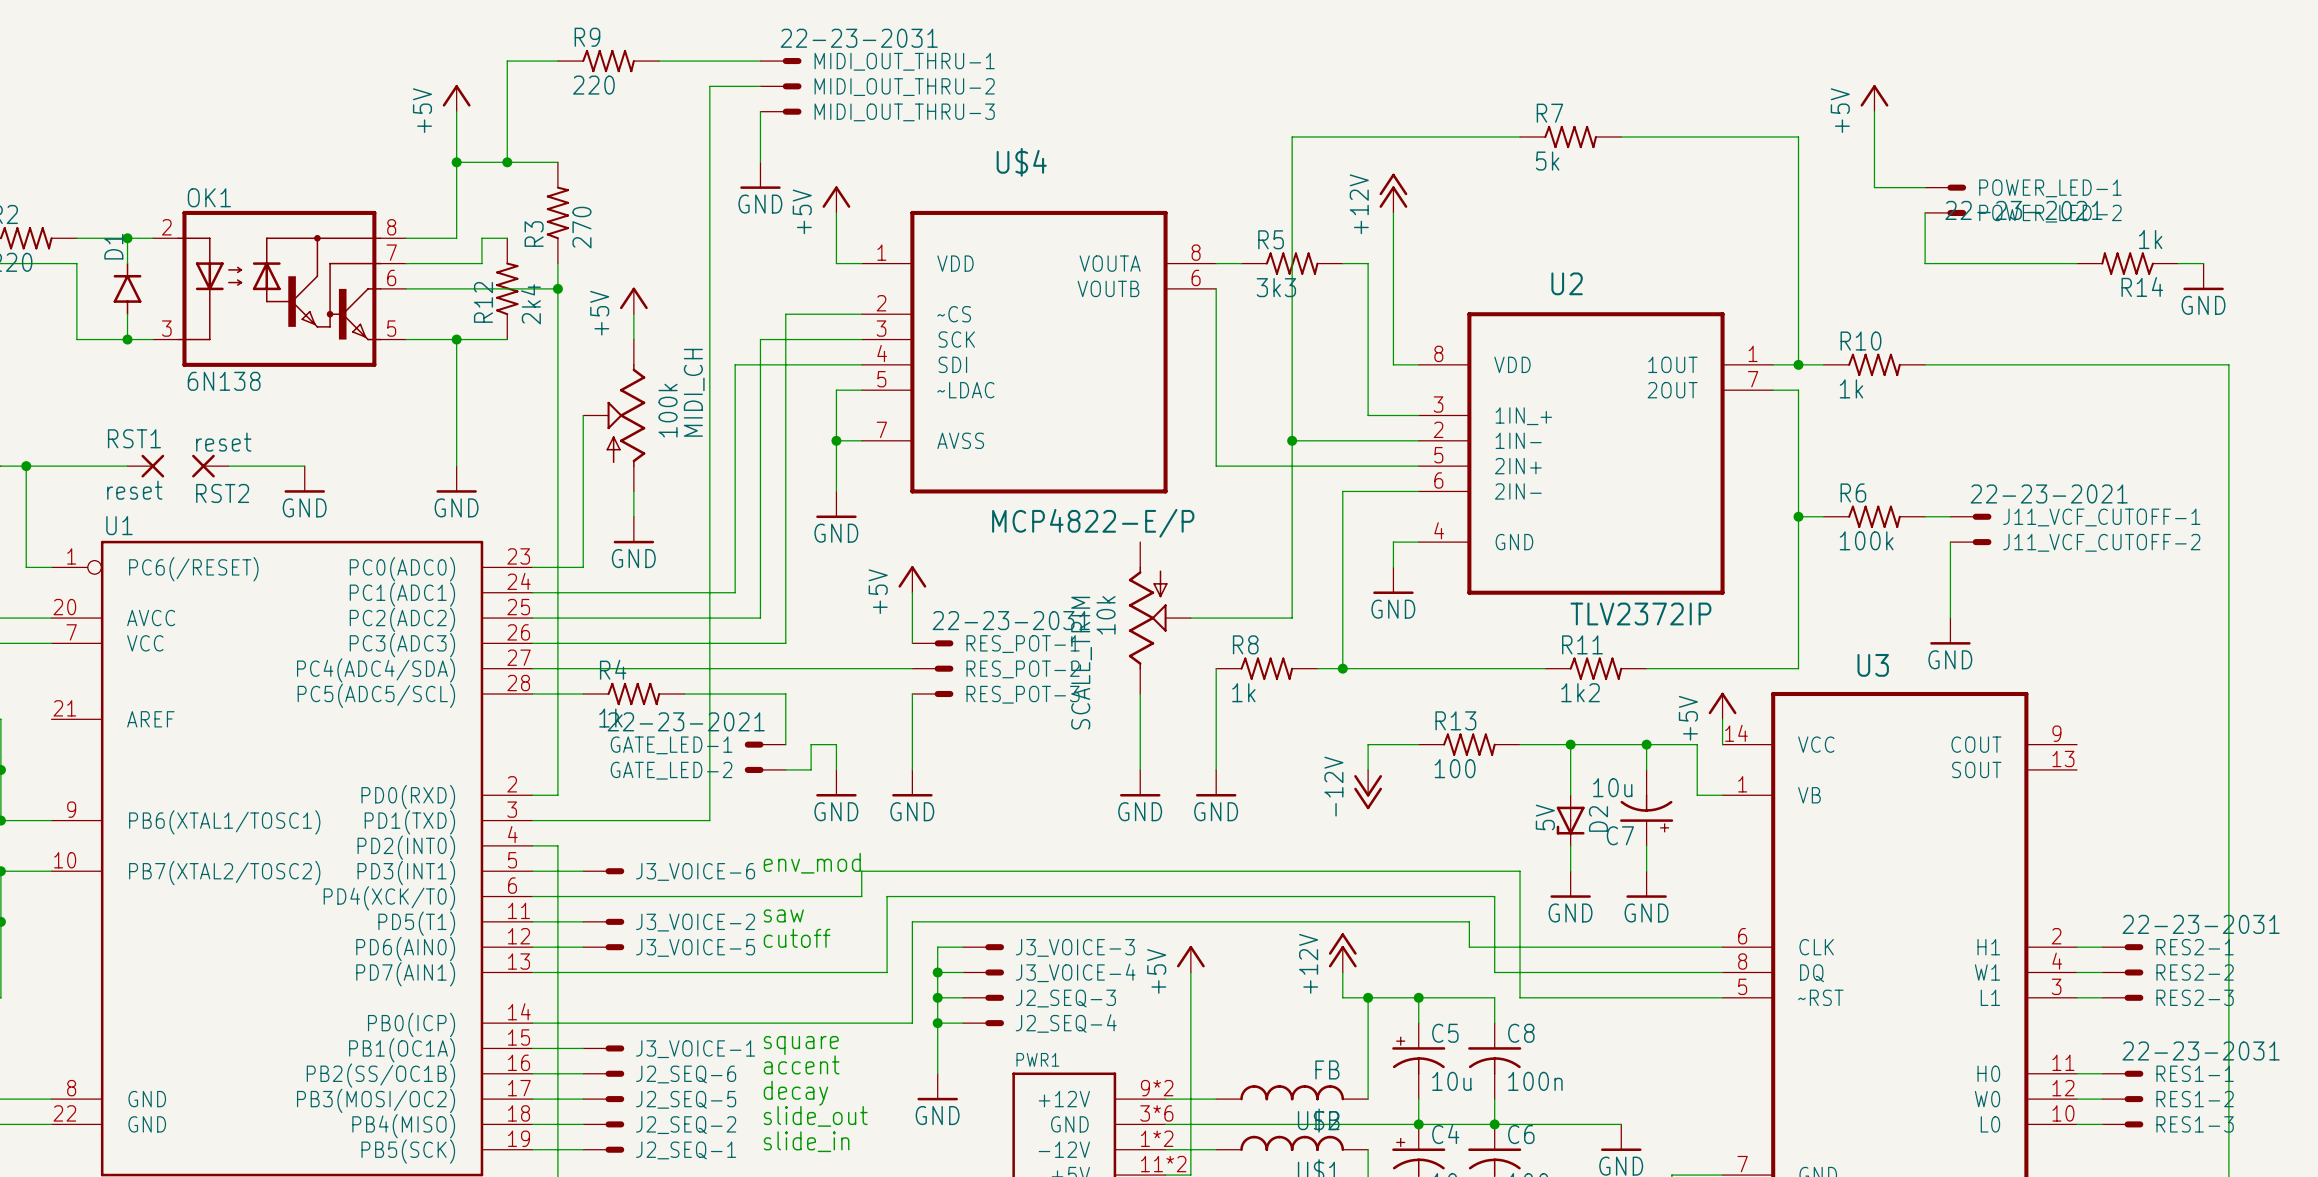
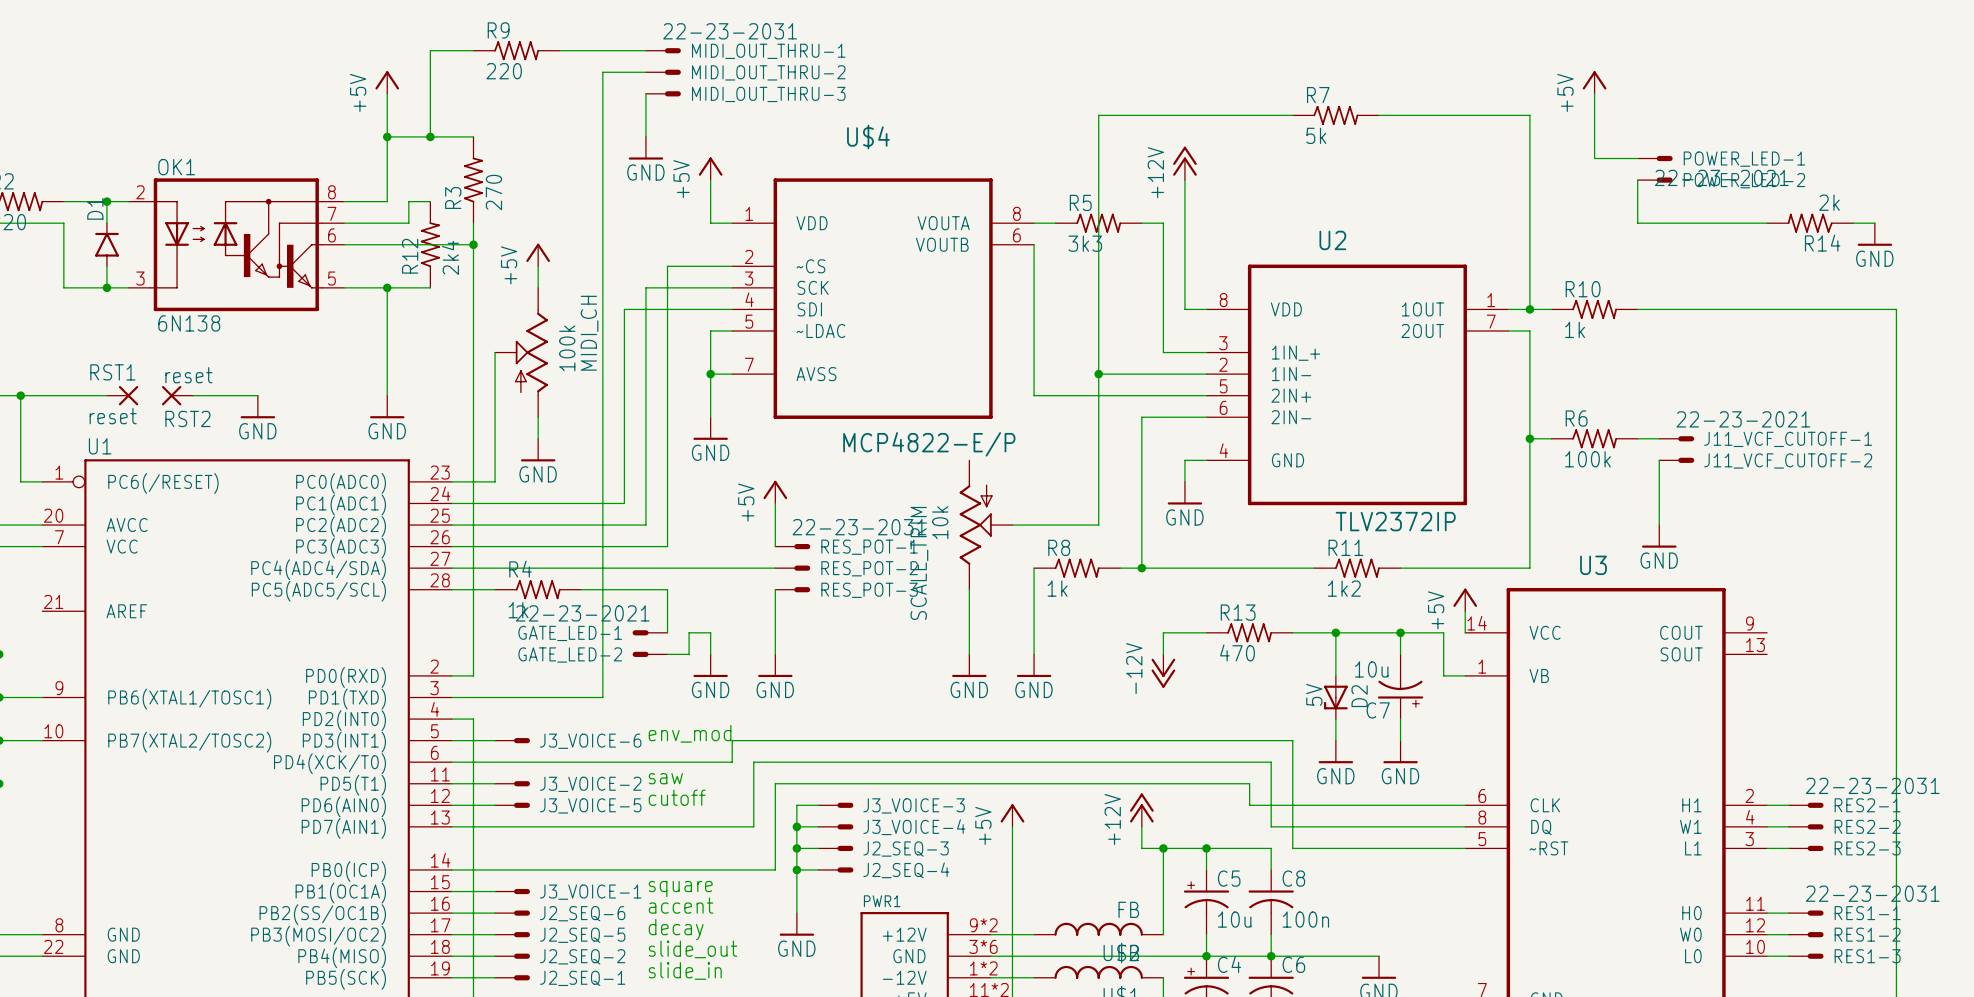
R14 value: 1k (2150, 239) -> 2k (1829, 202)
R13 value: 100 (1455, 768) -> 470 (1237, 652)

